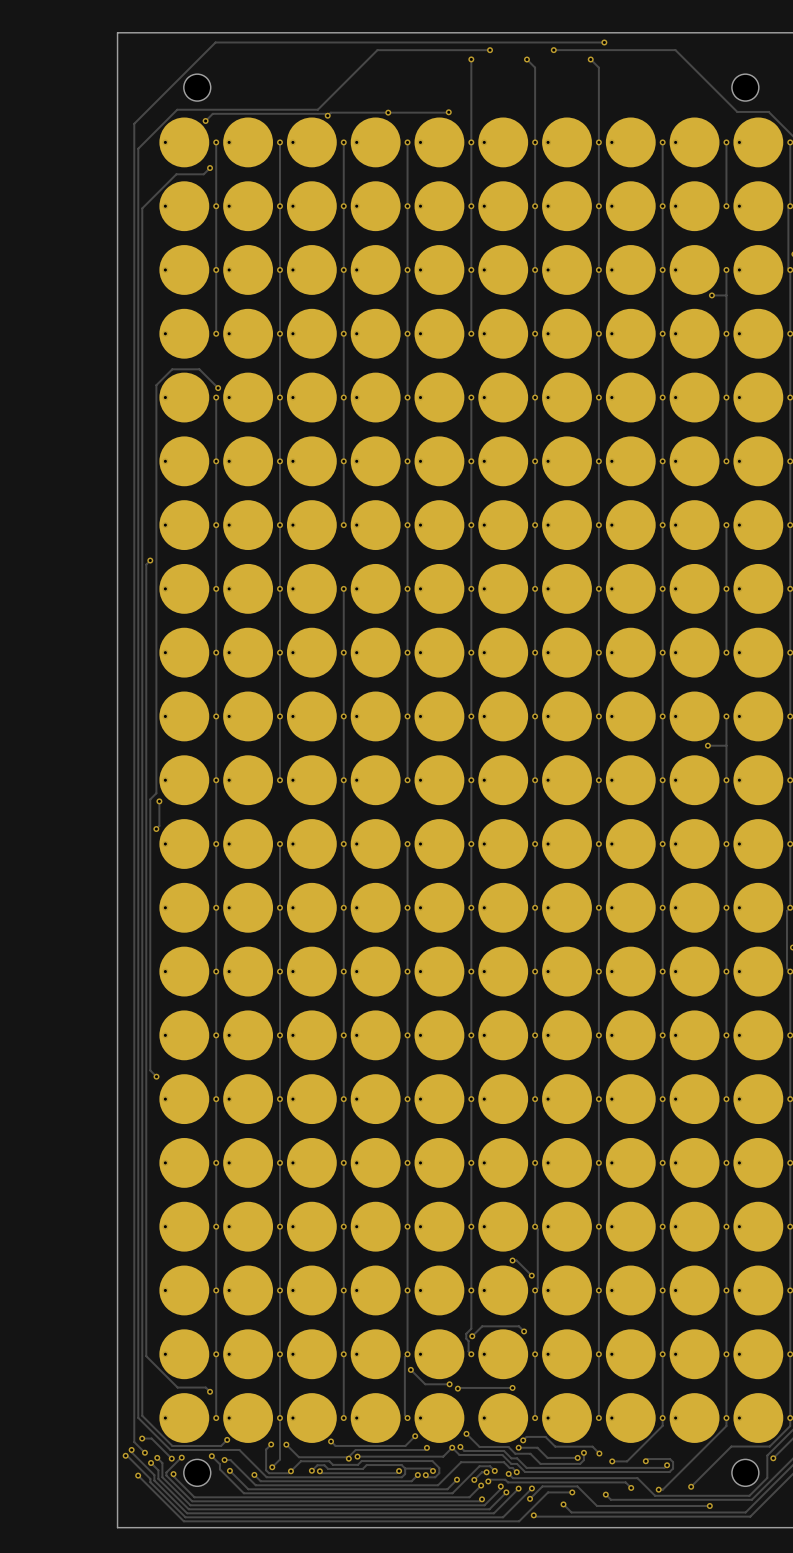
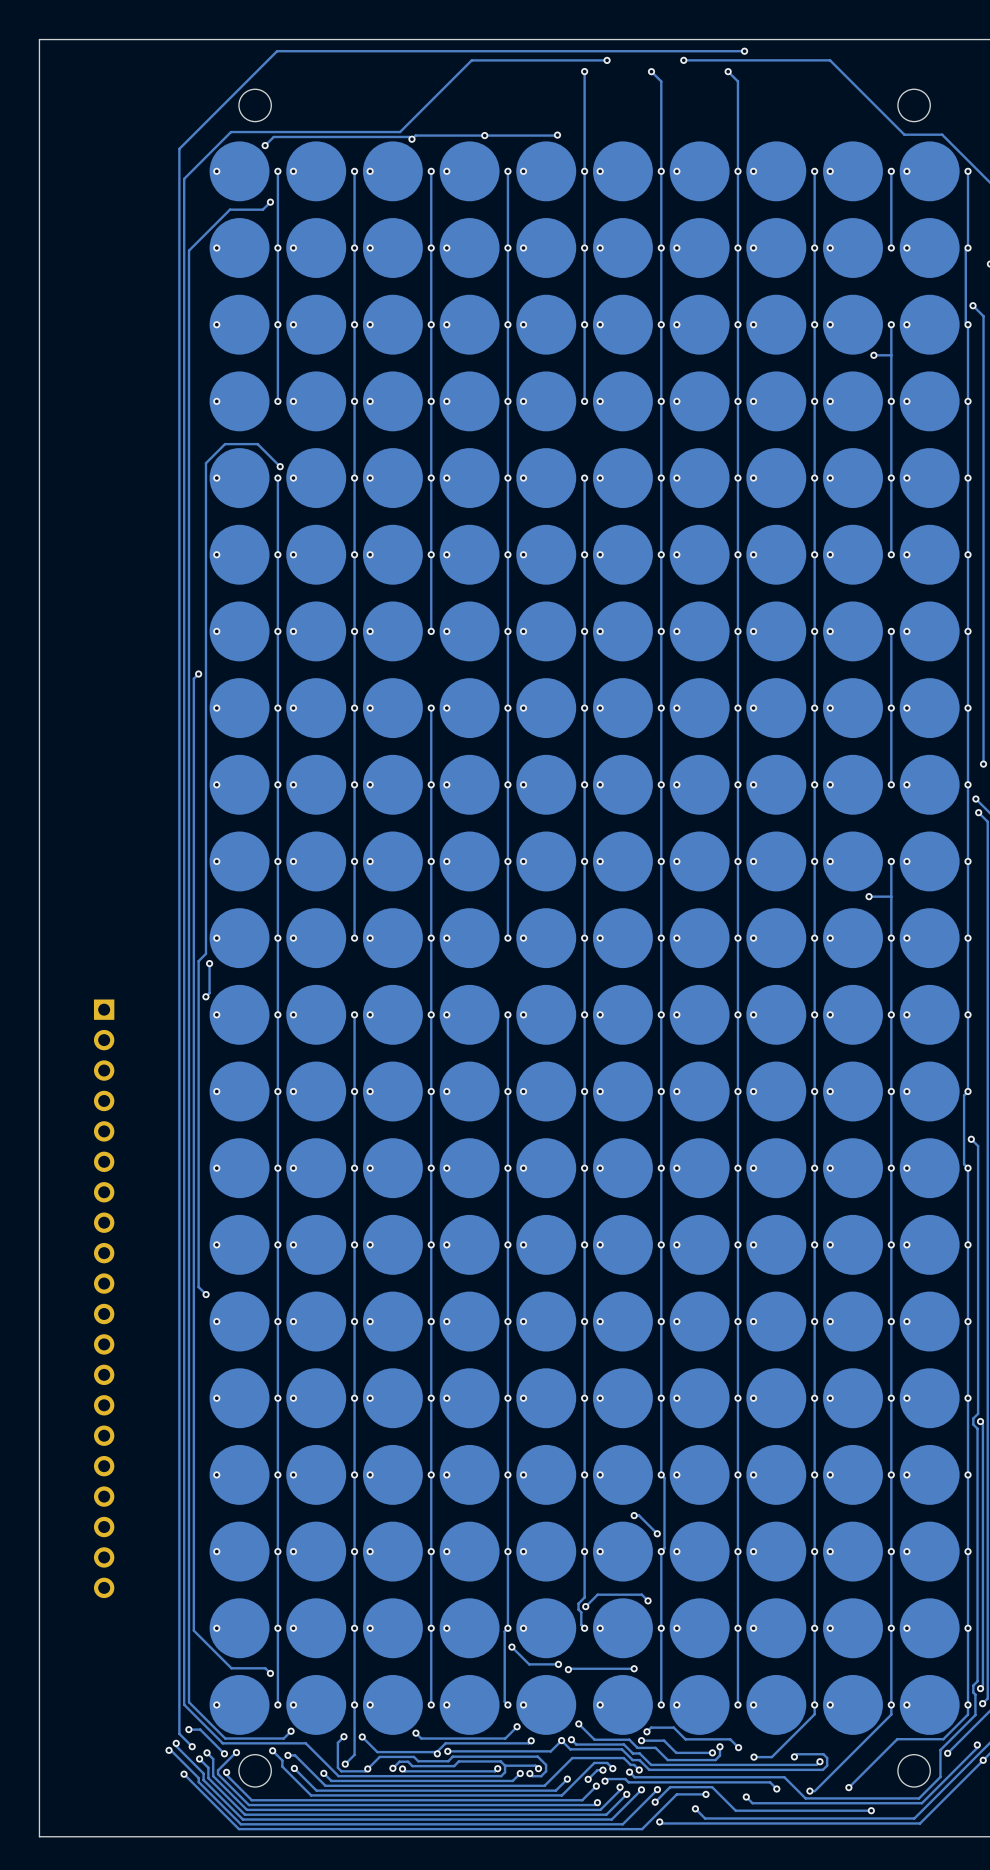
board edge: (117, 32) (117, 1527) -> (159, 39) (39, 39) (39, 1836) (159, 1836)
part: none -> (104, 1298)

